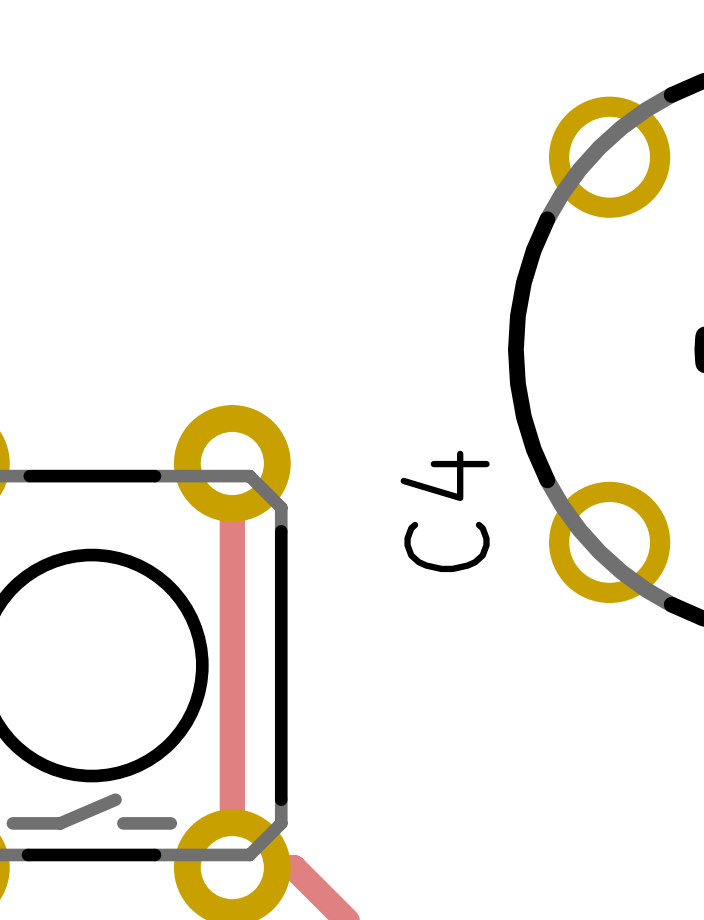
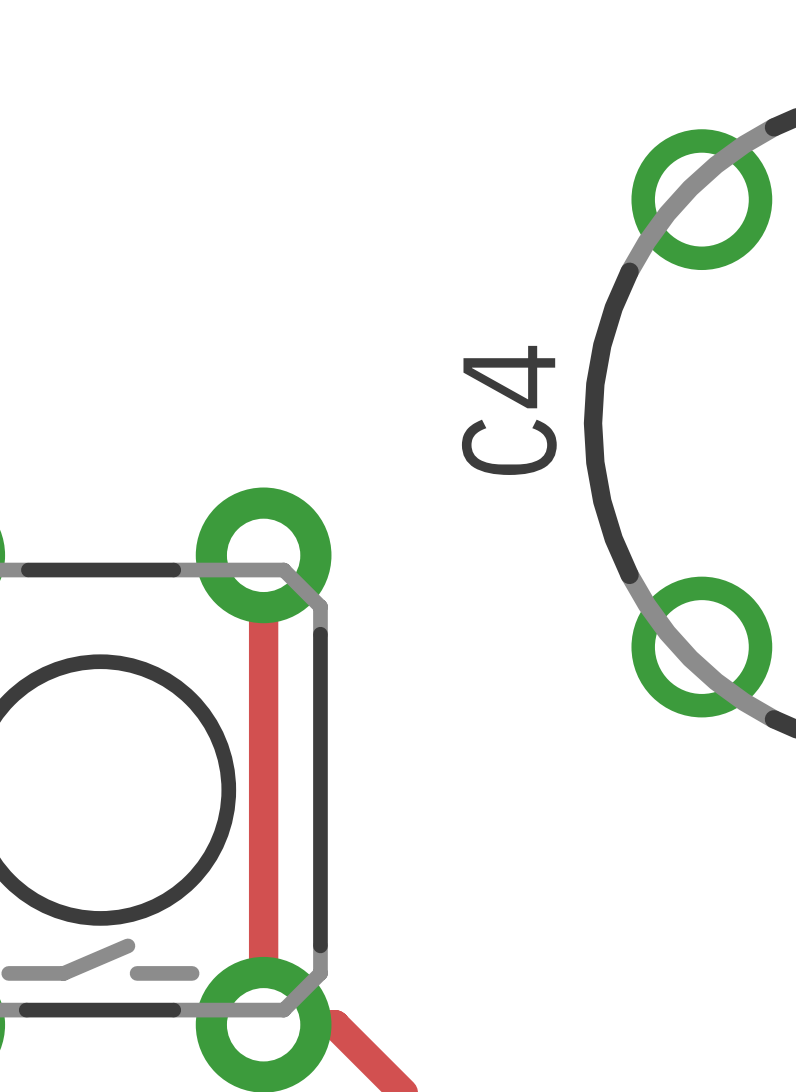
C4 name position: C4 (445, 511) -> C4 (509, 410)

